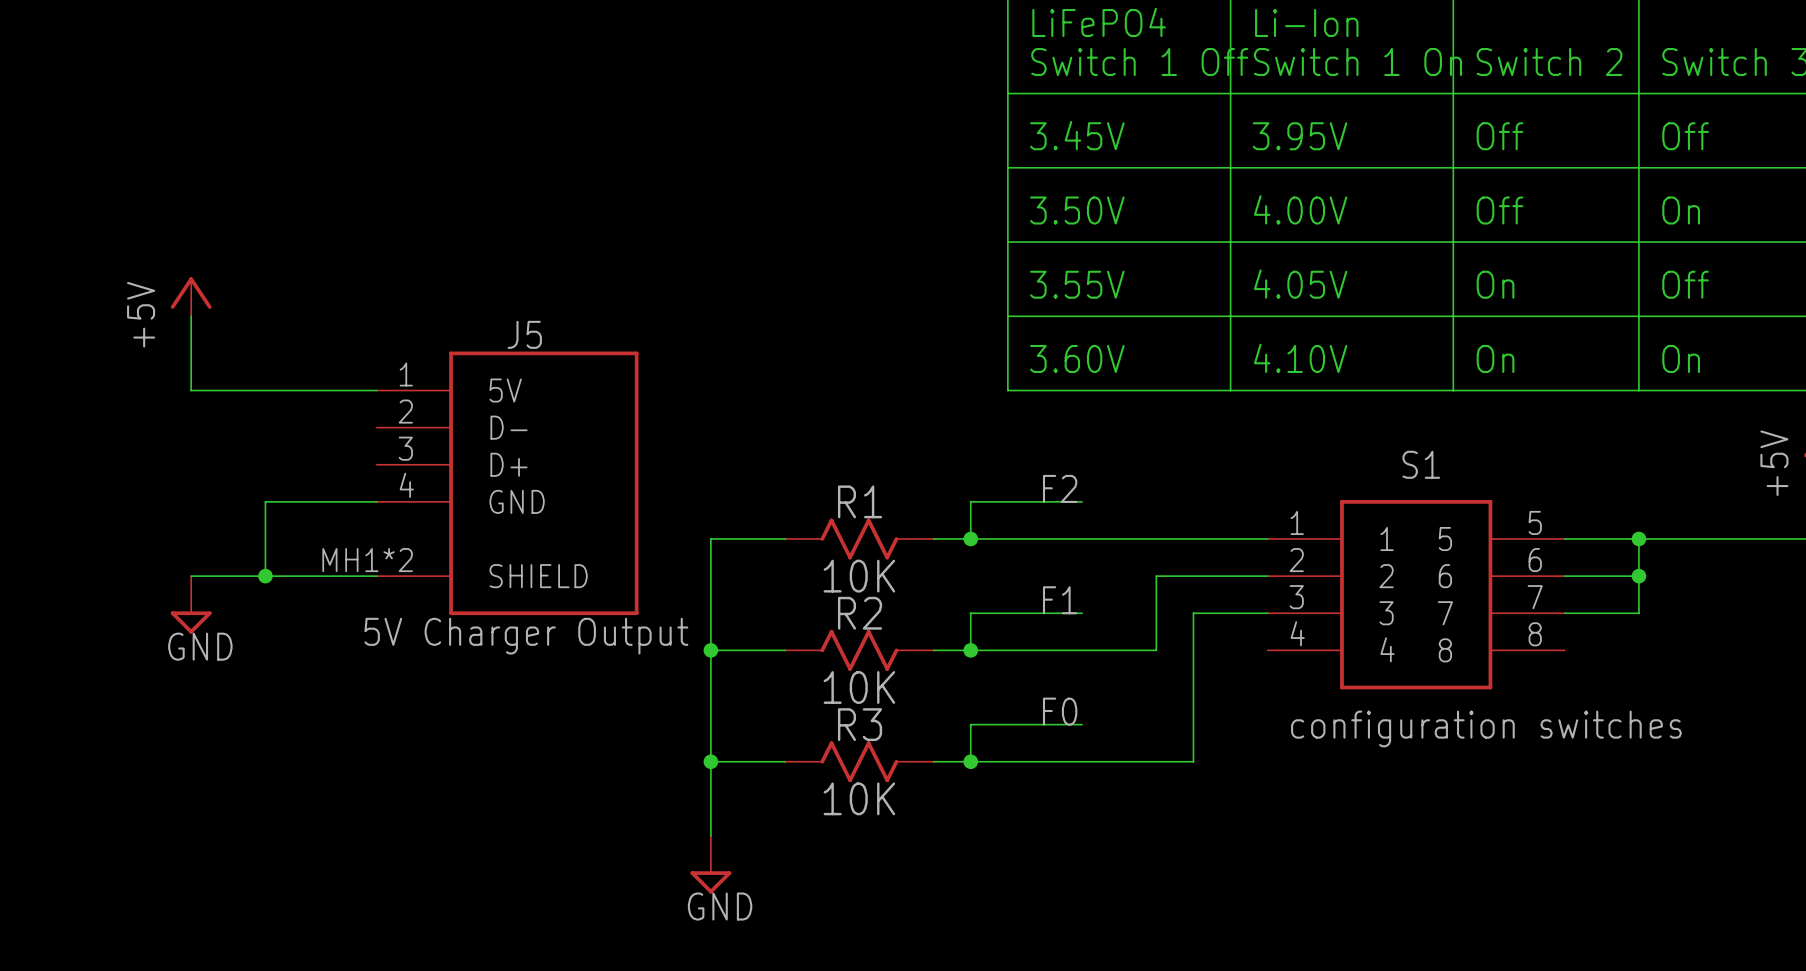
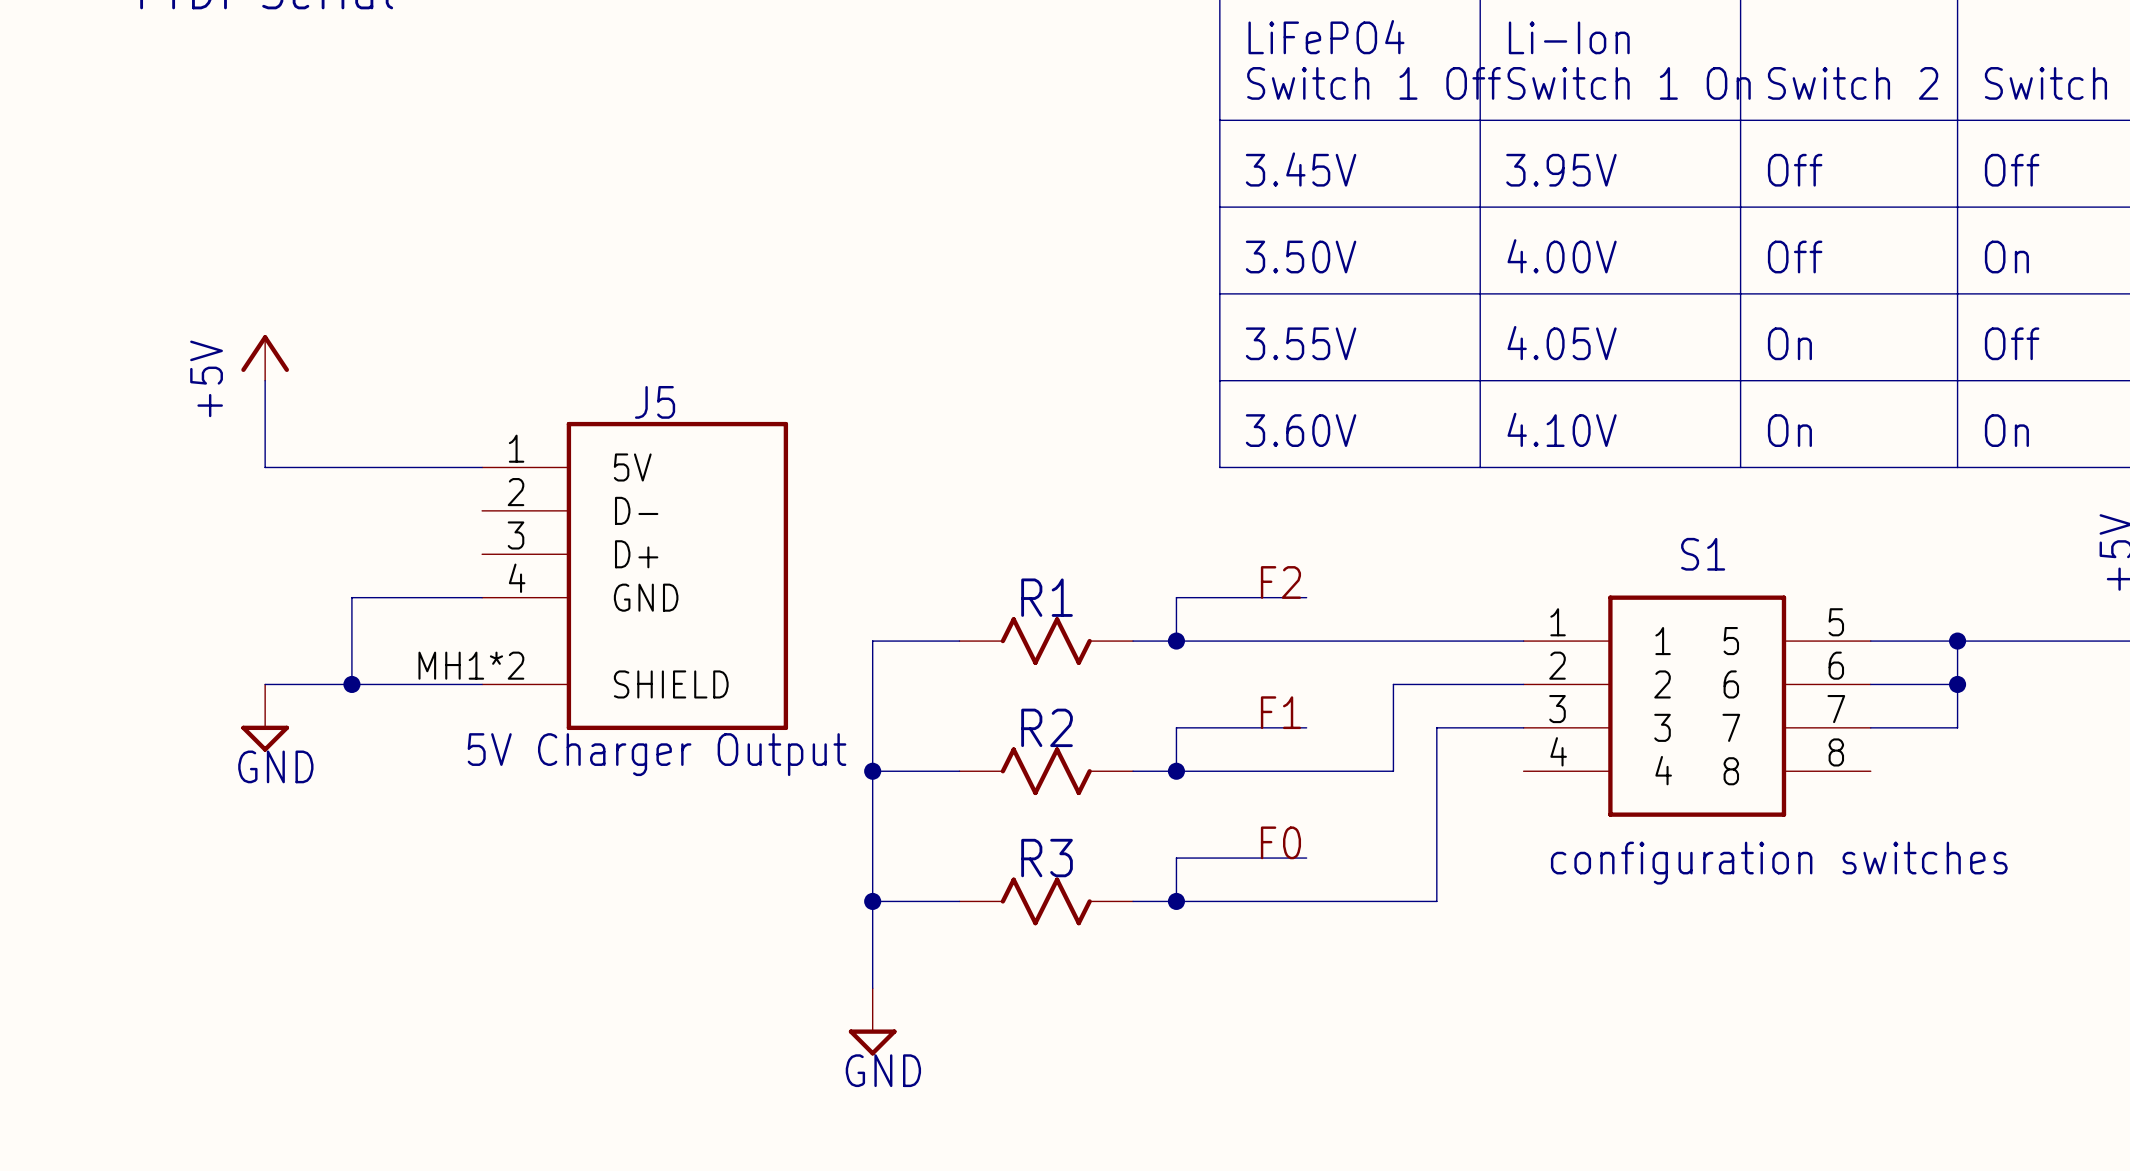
R1 value: 10K (859, 576) -> none
R2 value: 10K (859, 687) -> none
R3 value: 10K (859, 798) -> none

